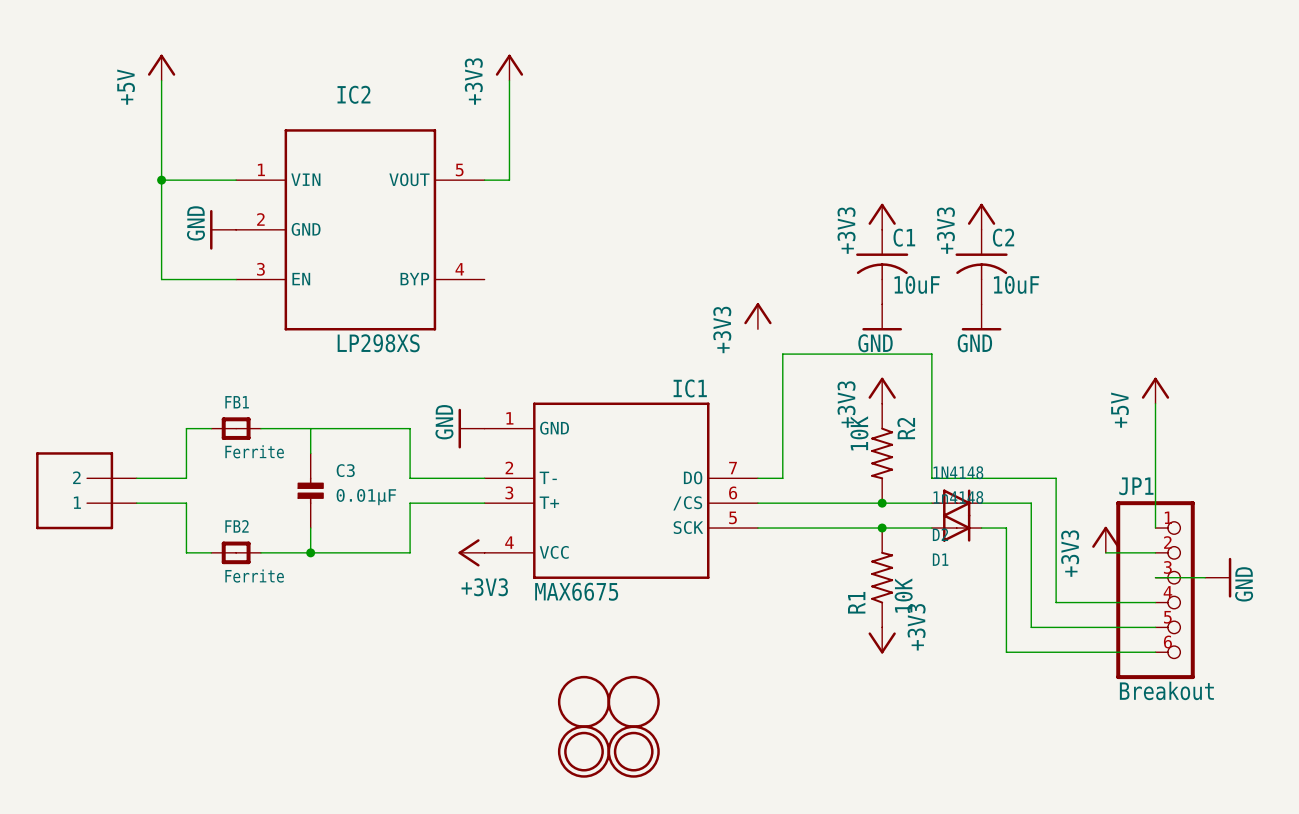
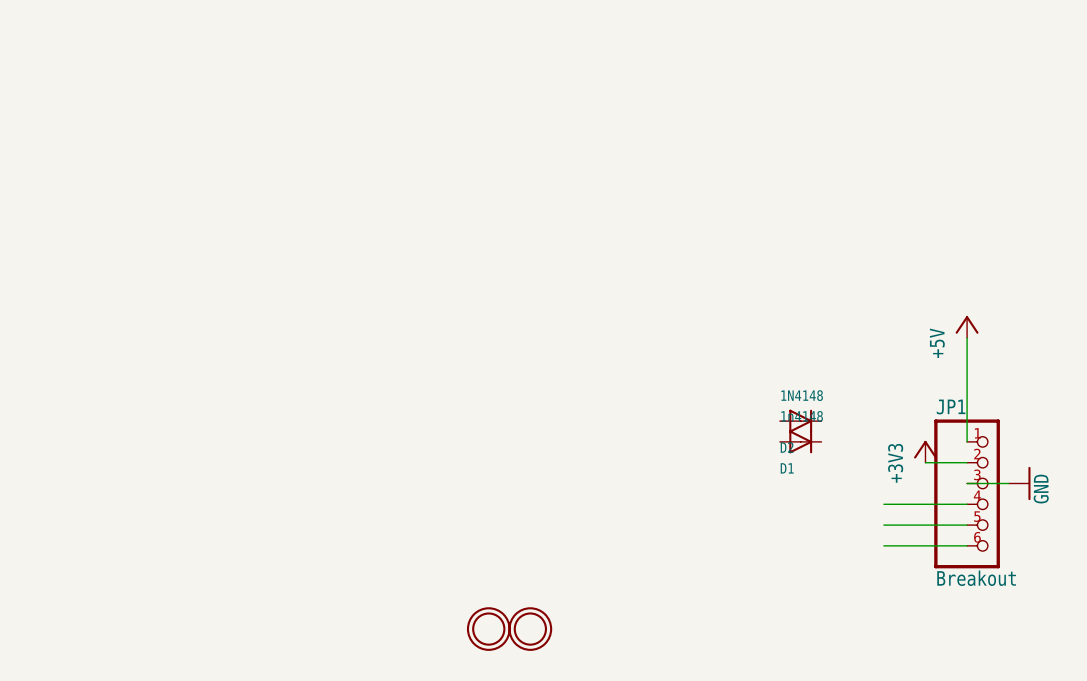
power symbol: +5V (161, 67) -> none
power symbol: +3V3 (509, 67) -> none
wire: (161, 80) (161, 279) (236, 279) -> none
wire: (509, 80) (509, 180) (484, 180) -> none
wire: (161, 180) (236, 180) -> none
junction: (161, 180) -> none
power symbol: +3V3 (882, 216) -> none
power symbol: +3V3 (981, 216) -> none
power symbol: GND (223, 229) -> none
IC2: LP298XS (360, 229) -> none
C1: 10uF (882, 267) -> none
C2: 10uF (981, 267) -> none
power symbol: +3V3 (757, 316) -> none
power symbol: GND (882, 317) -> none
power symbol: GND (981, 317) -> none
power symbol: +3V3 (882, 390) -> none
wire: (211, 428) (186, 428) (186, 478) (136, 478) -> none
FB1: Ferrite (236, 428) -> none
wire: (260, 428) (410, 428) (410, 478) (484, 478) -> none
wire: (310, 428) (310, 453) -> none
power symbol: GND (471, 428) -> none
R2: 10K (882, 453) -> none
wire: (757, 478) (782, 478) (782, 354) (931, 354) (931, 478) (1056, 478) (1056, 602) -> none
part: (86, 490) -> none
C3: 0.01µF (310, 490) -> none
IC1: MAX6675 (621, 490) -> none
wire: (136, 503) (186, 503) (186, 552) (211, 552) -> none
wire: (484, 503) (410, 503) (410, 552) (260, 552) -> none
wire: (757, 503) (931, 503) -> none
junction: (882, 503) -> none
wire: (981, 503) (1031, 503) (1031, 627) (1056, 627) -> none
wire: (310, 528) (310, 552) -> none
wire: (757, 528) (931, 528) -> none
junction: (882, 528) -> none
wire: (981, 528) (1006, 528) (1006, 652) (1056, 652) -> none
FB2: Ferrite (236, 552) -> none
junction: (310, 552) -> none
power symbol: +3V3 (471, 552) -> none
R1: 10K (882, 577) -> none
power symbol: +3V3 (882, 640) -> none
part: (584, 701) -> none
part: (633, 701) -> none

